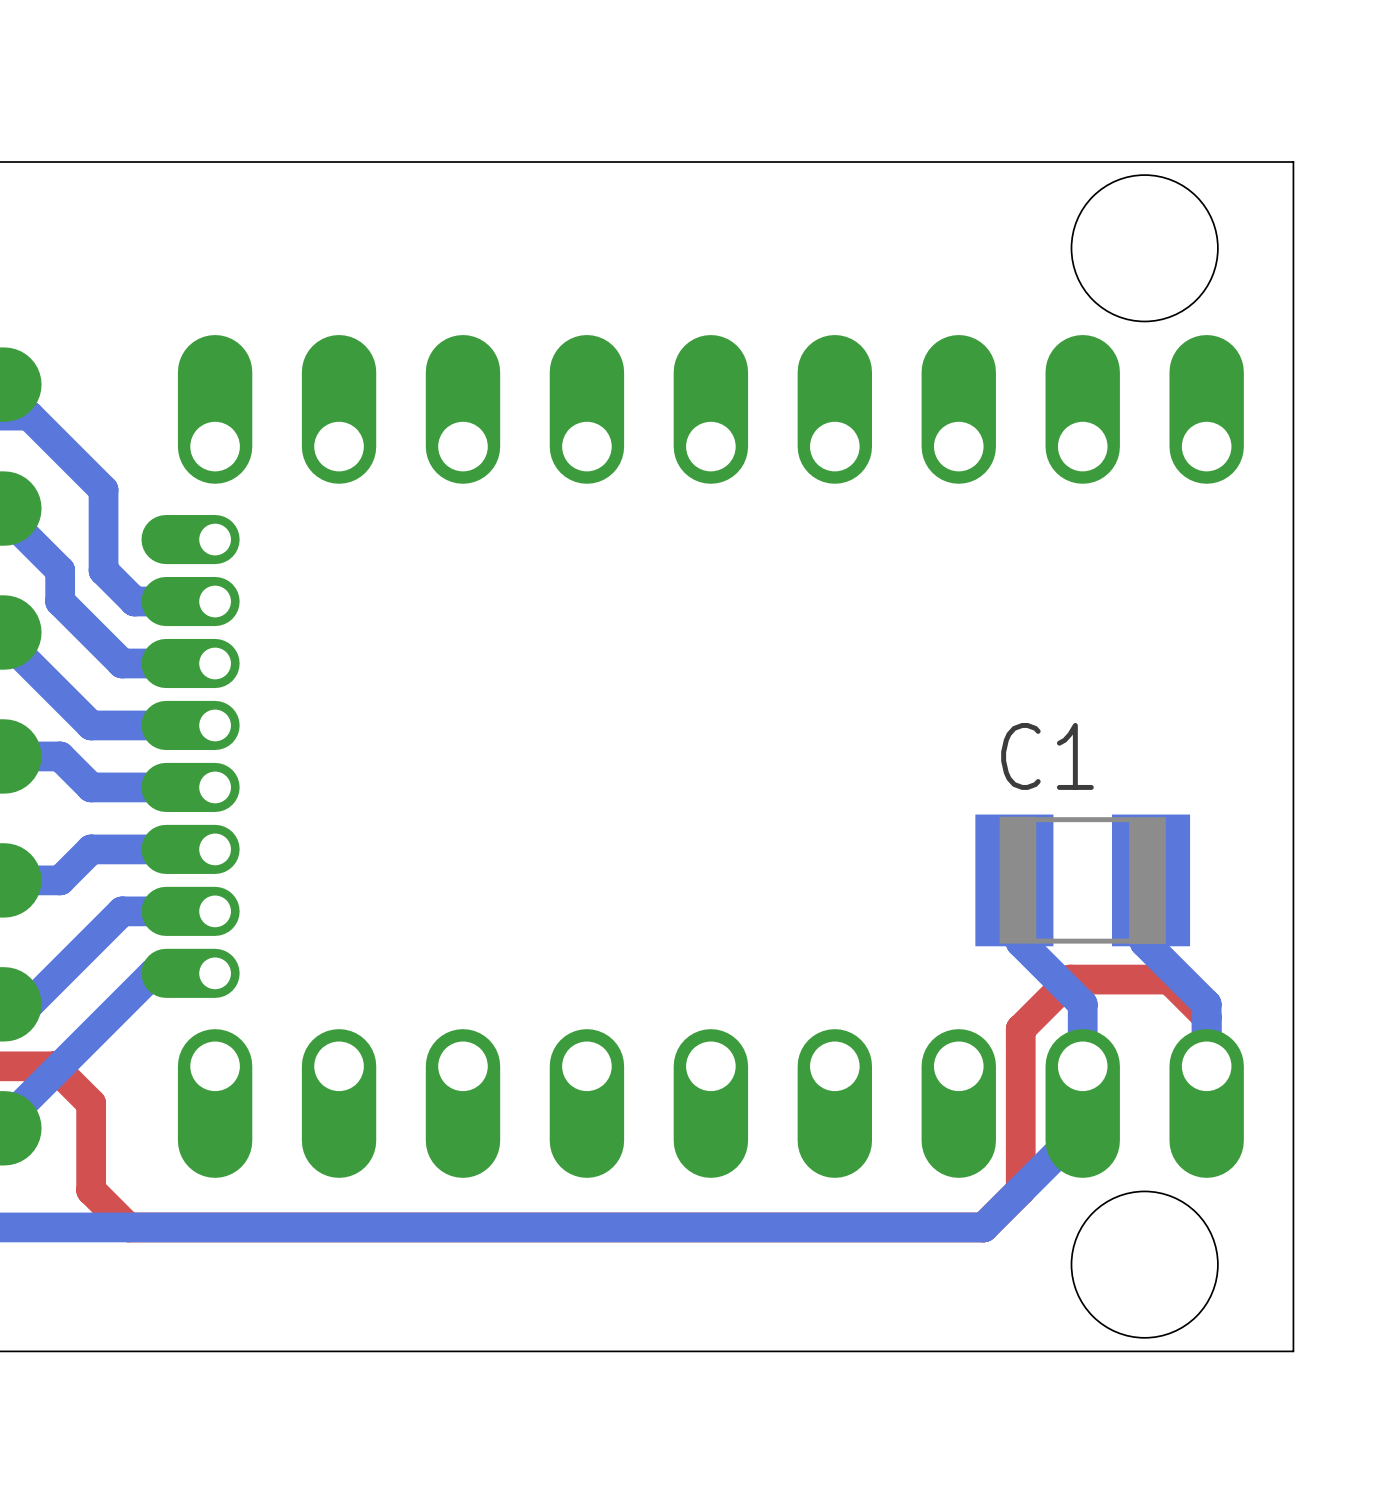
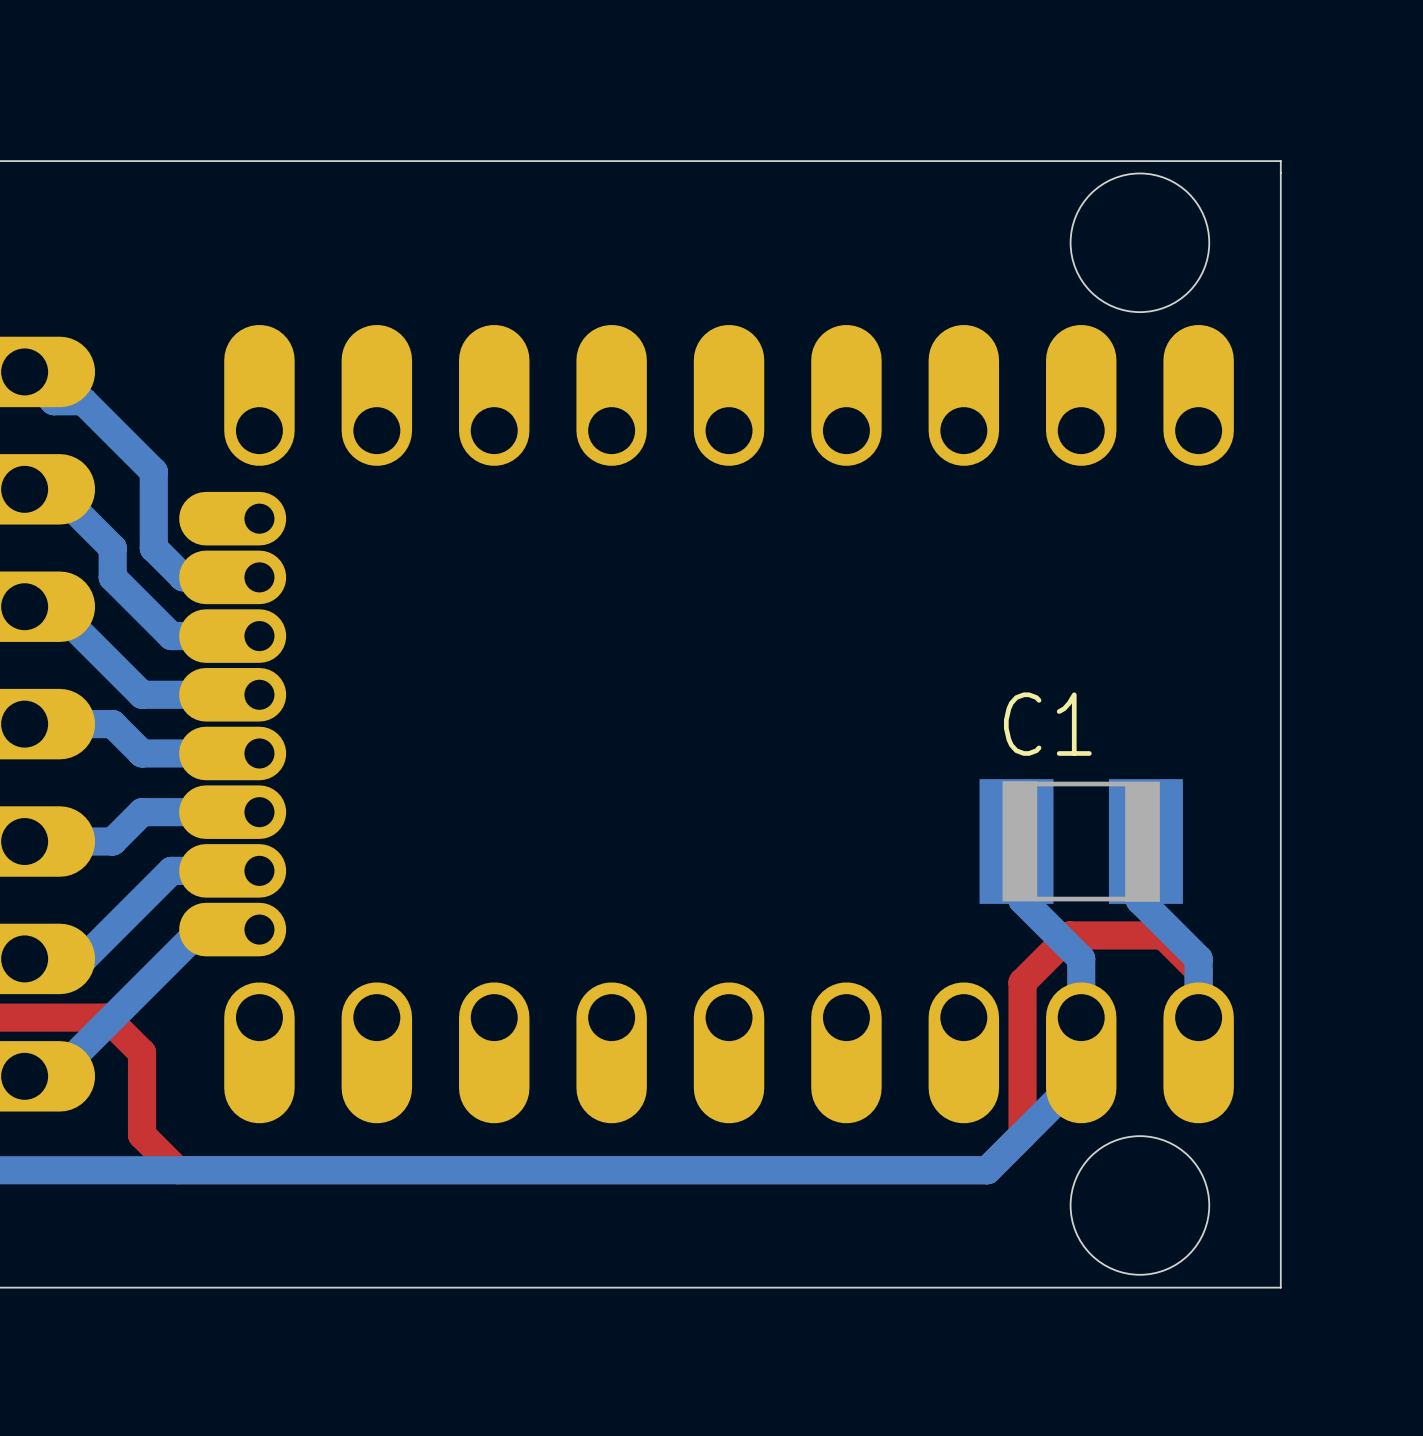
part footprint: [141, 335, 1244, 1178] -> [179, 324, 1234, 1124]

